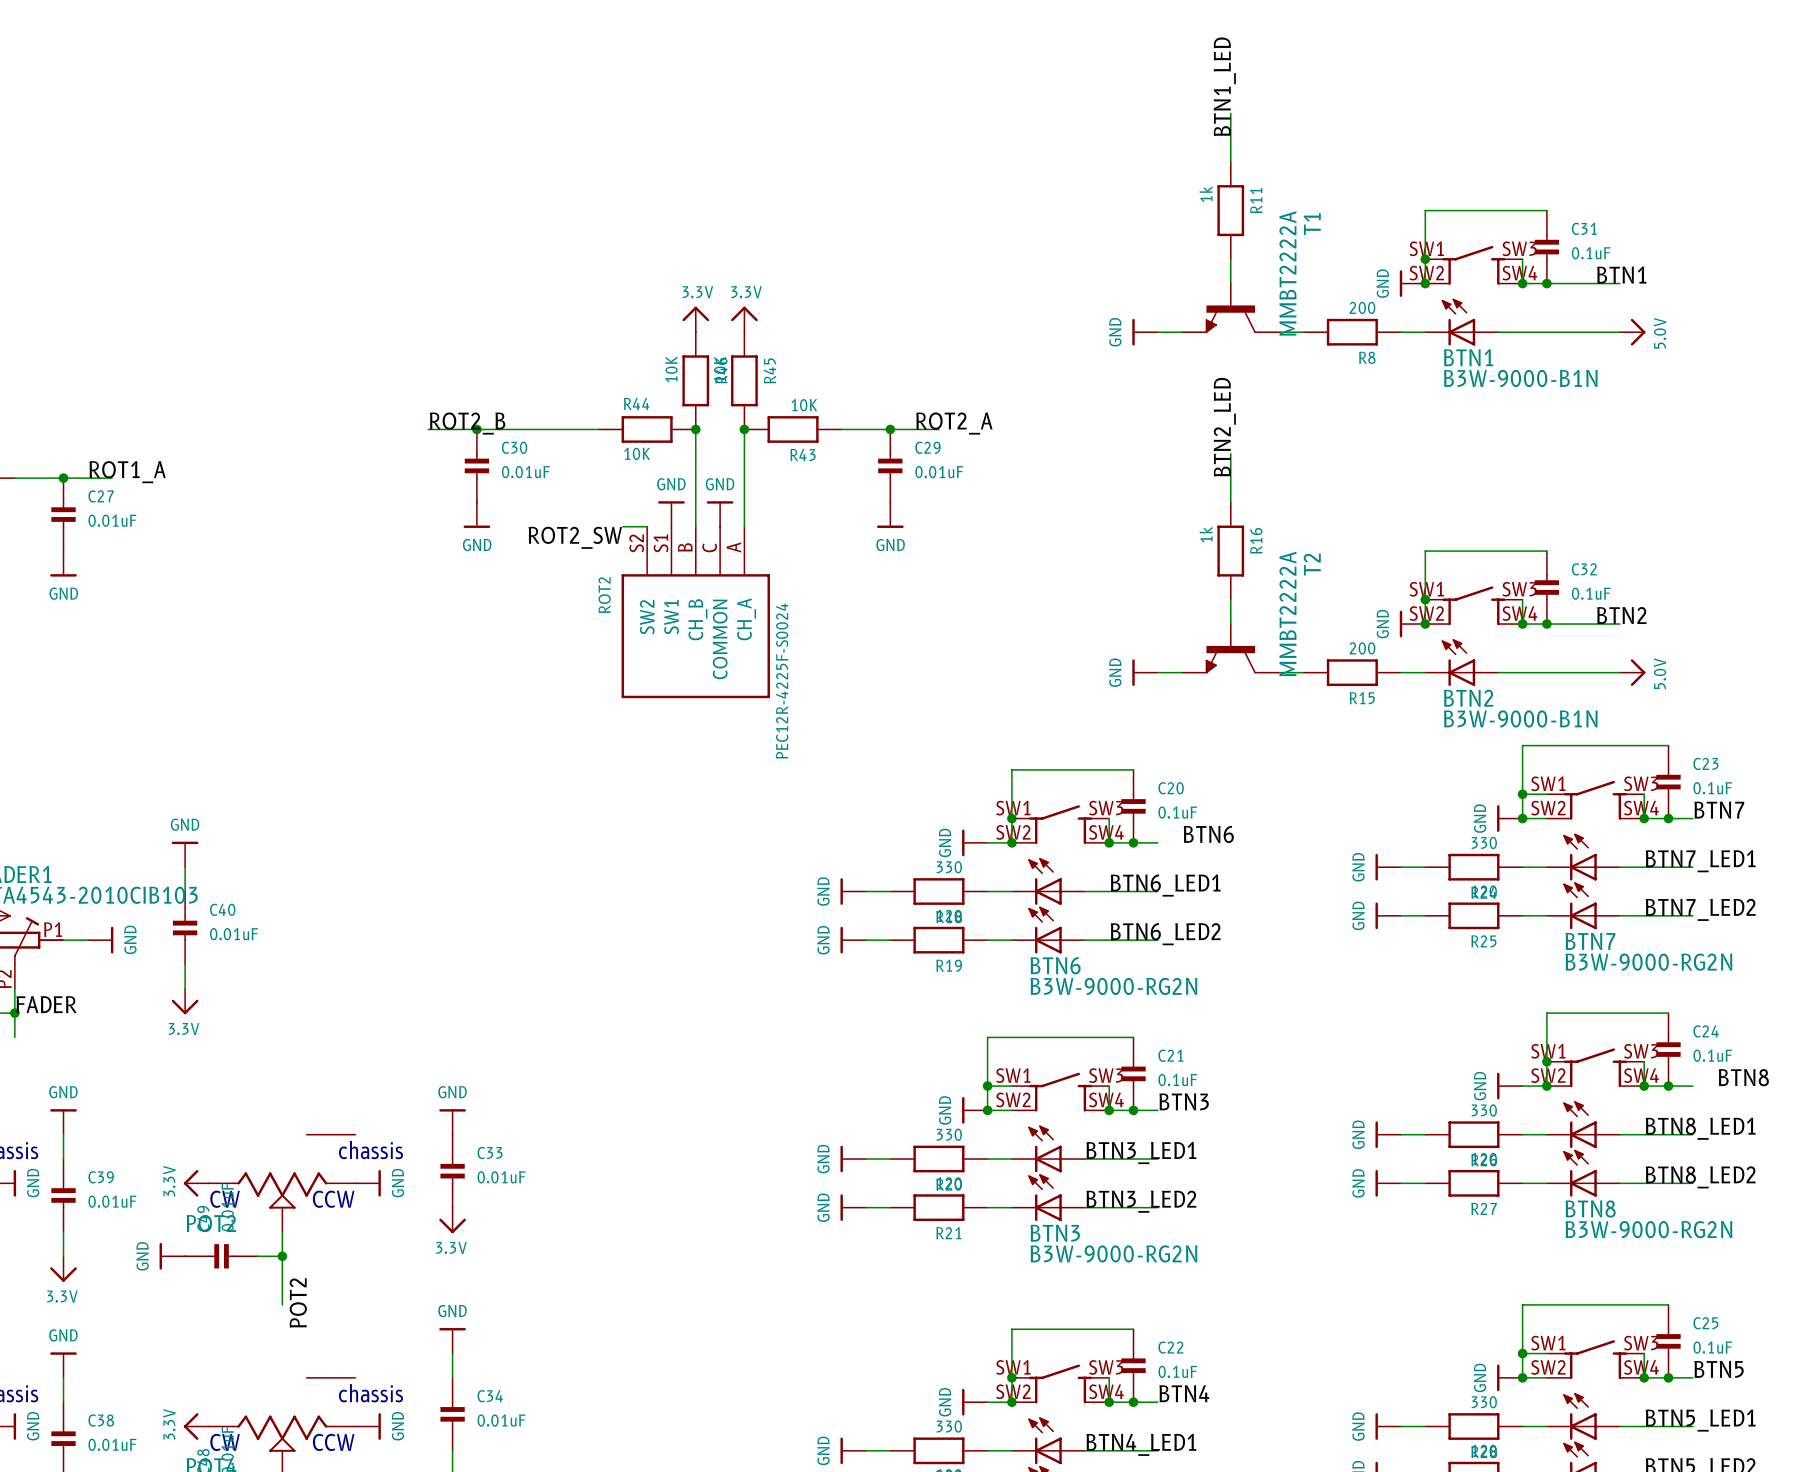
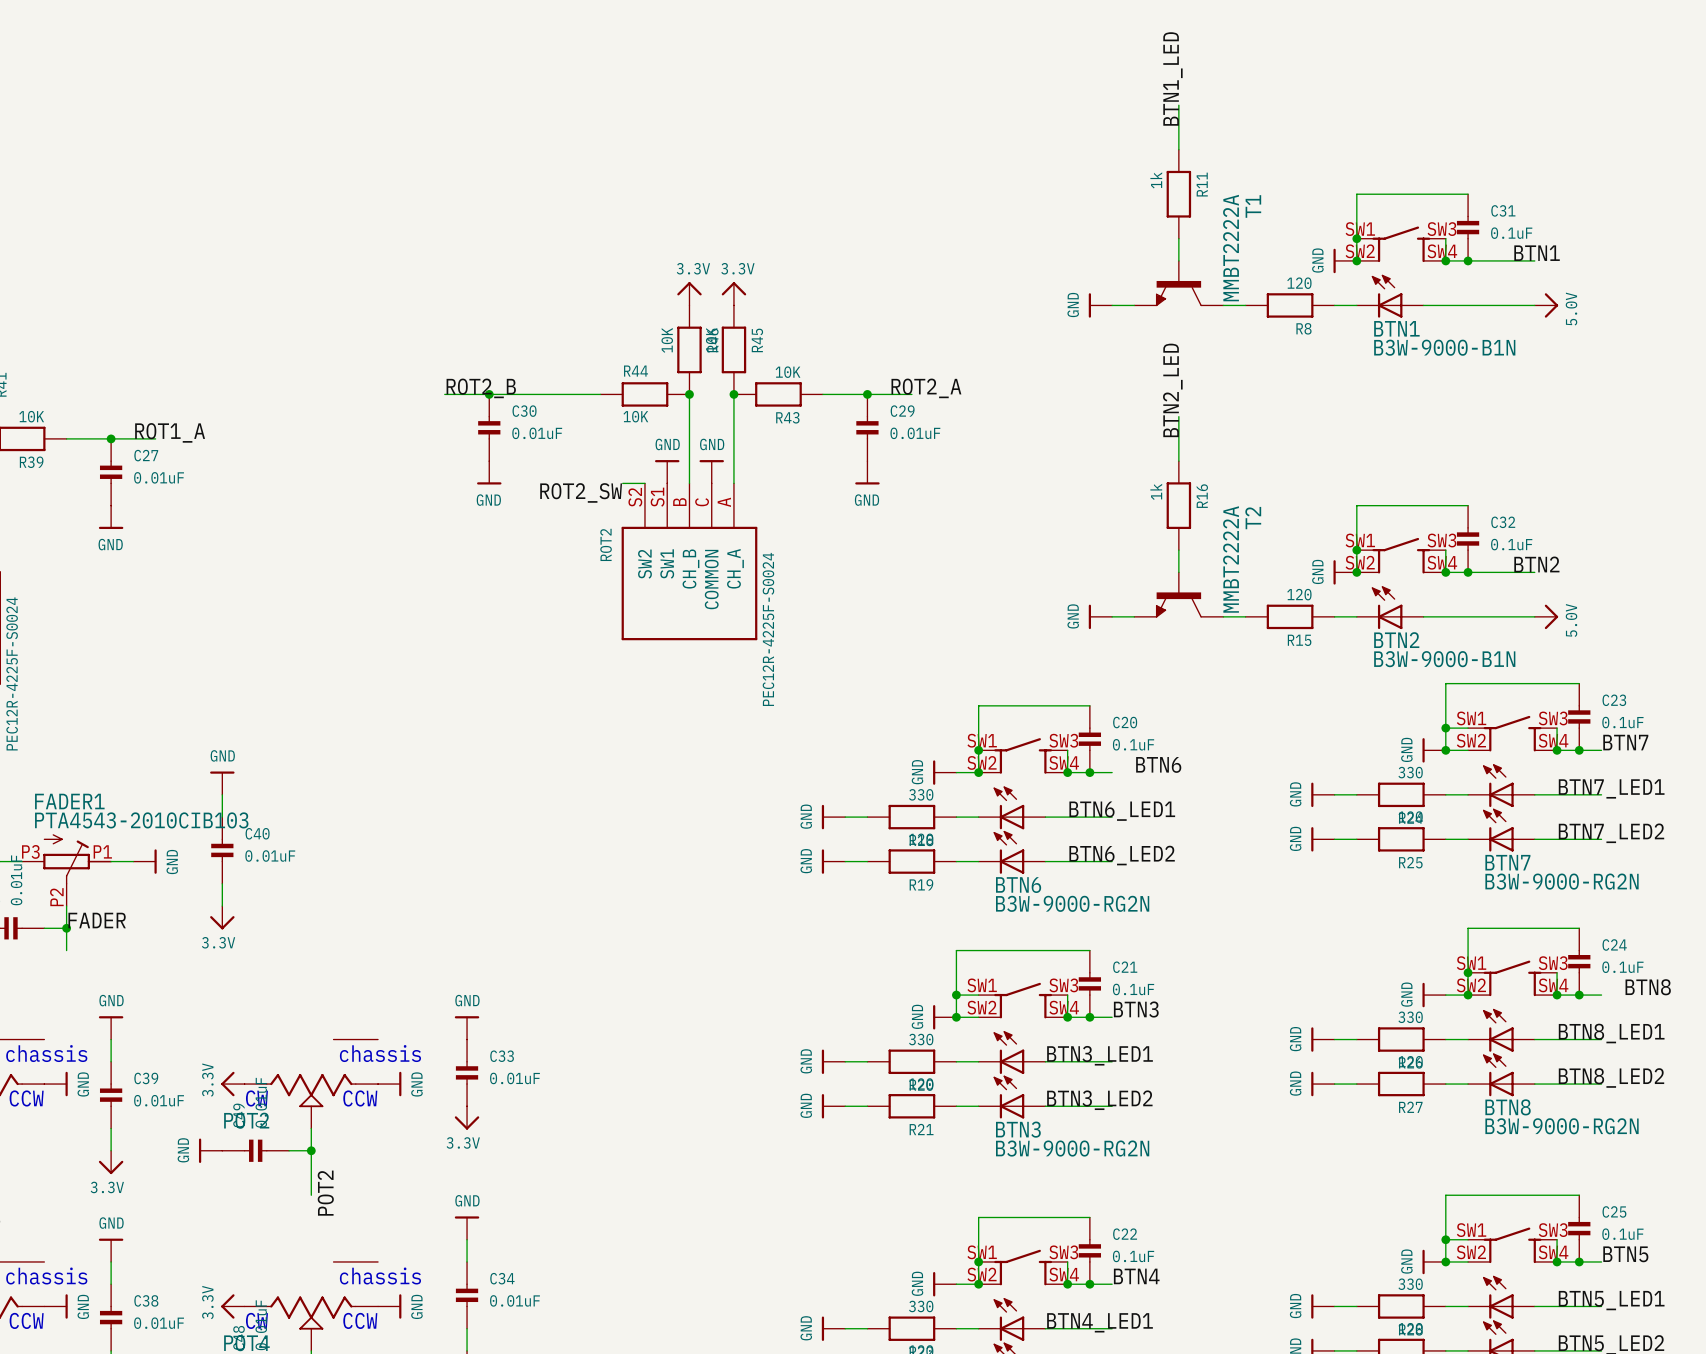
R8 value: 200 (1362, 307) -> 120 (1299, 283)
R15 value: 200 (1362, 648) -> 120 (1299, 594)

